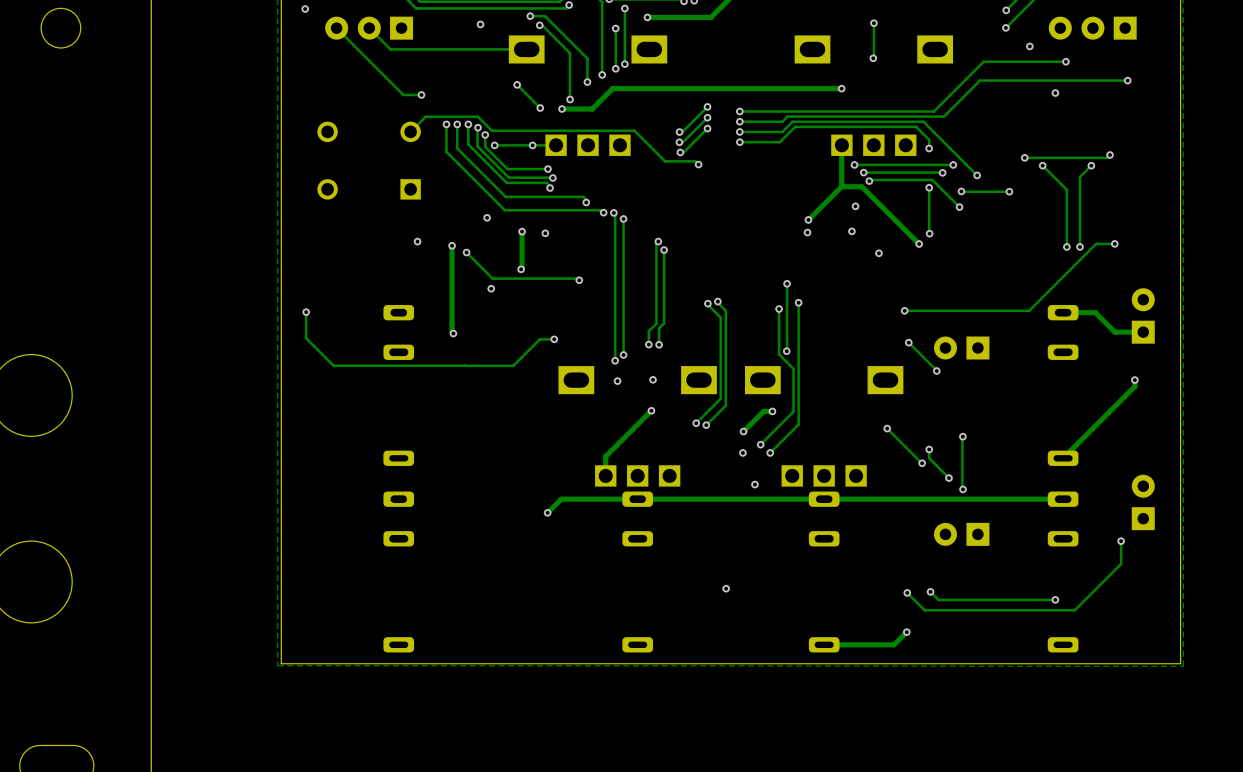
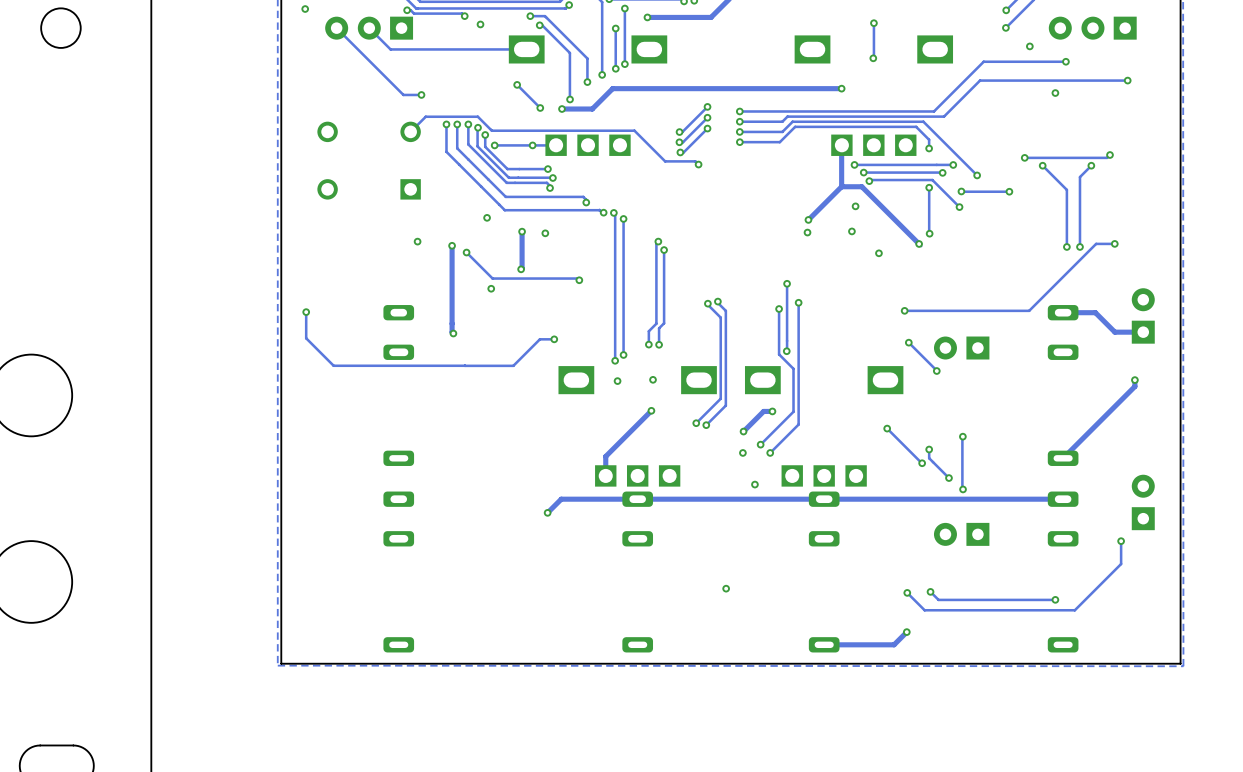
track: none -> (407, 10) (410, 10) (414, 13) (462, 13) (464, 16)
via: none -> (407, 10)
via: none -> (464, 16)

